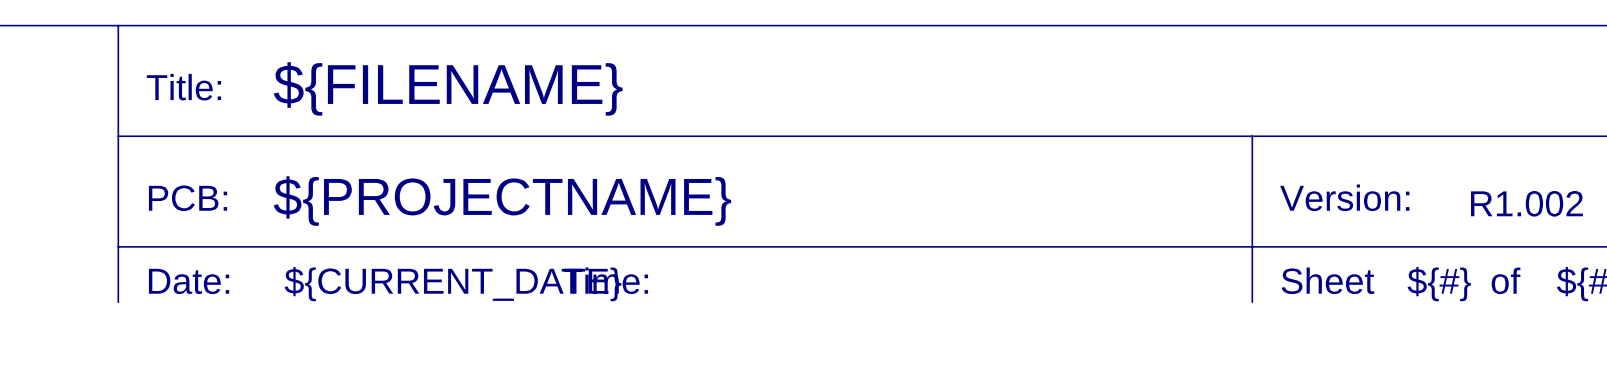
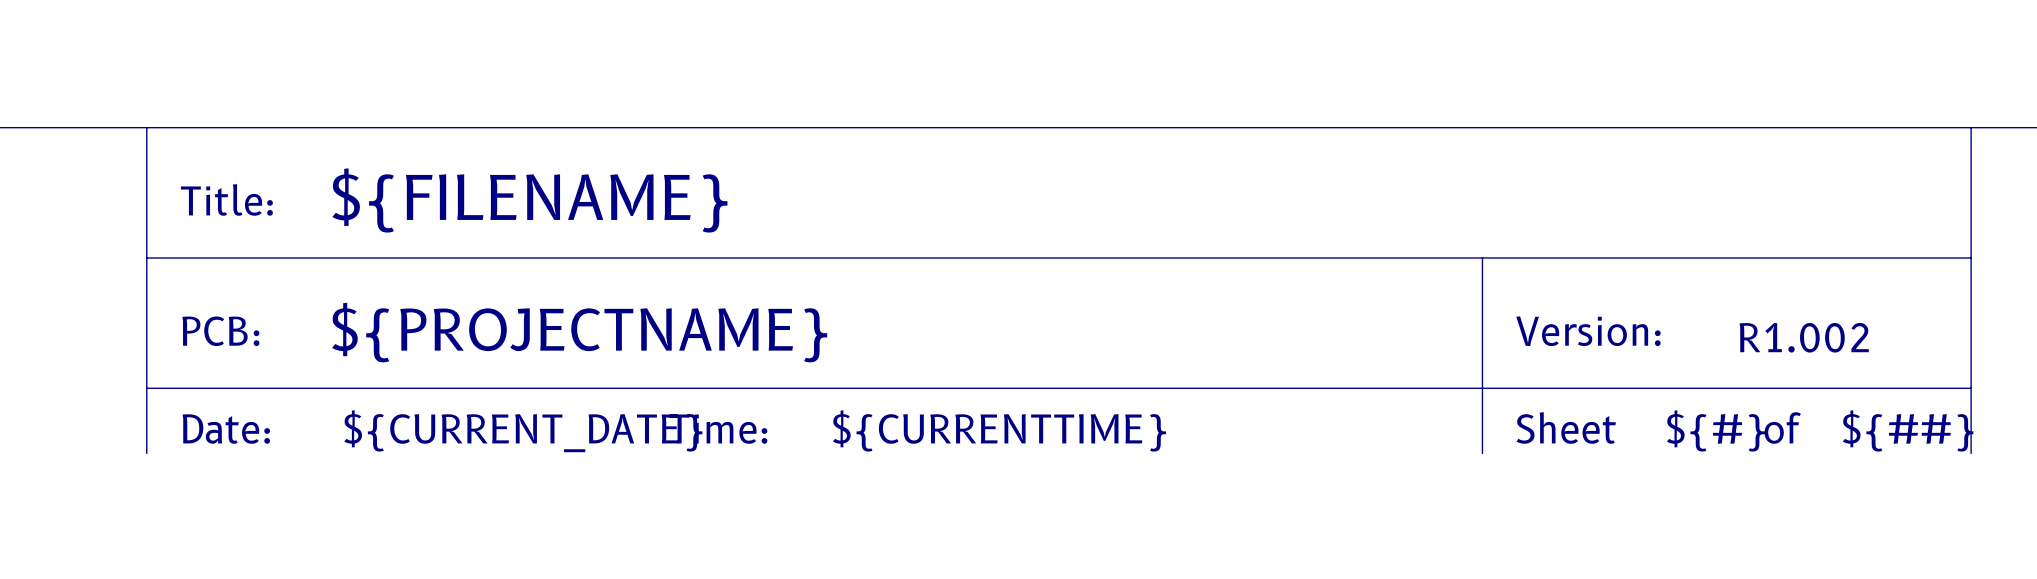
text: none -> ${CURRENTTIME} (999, 430)

